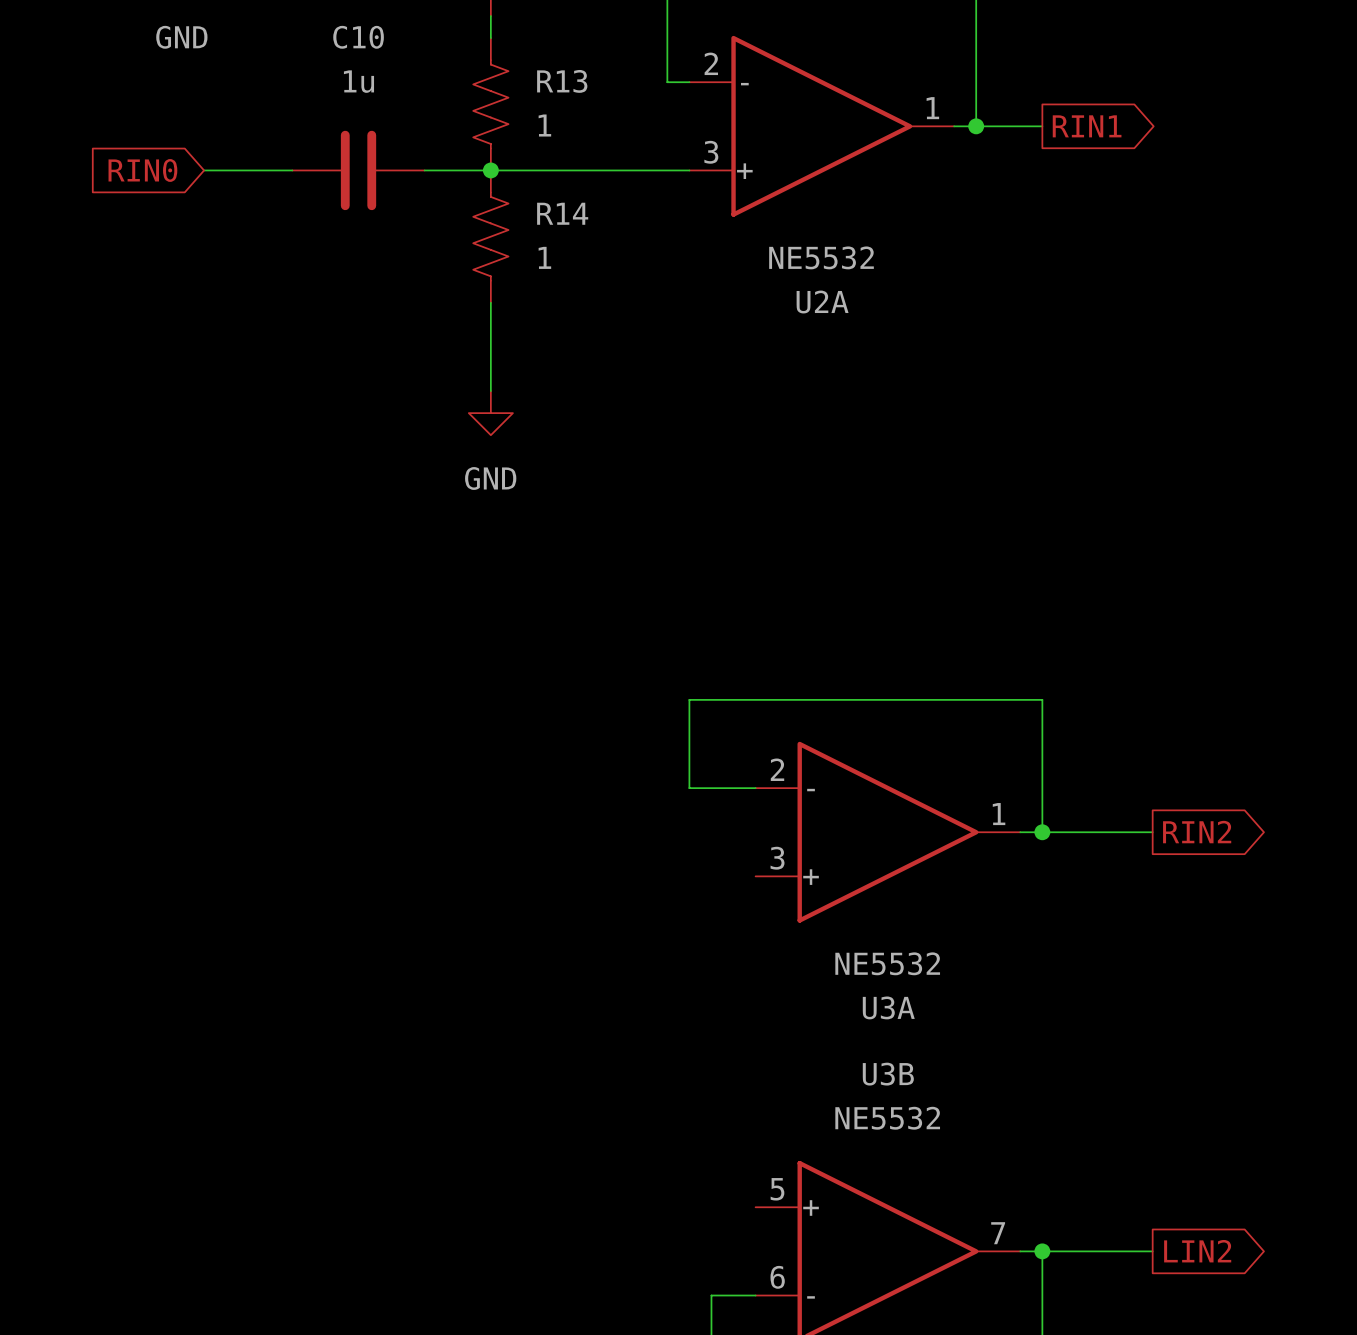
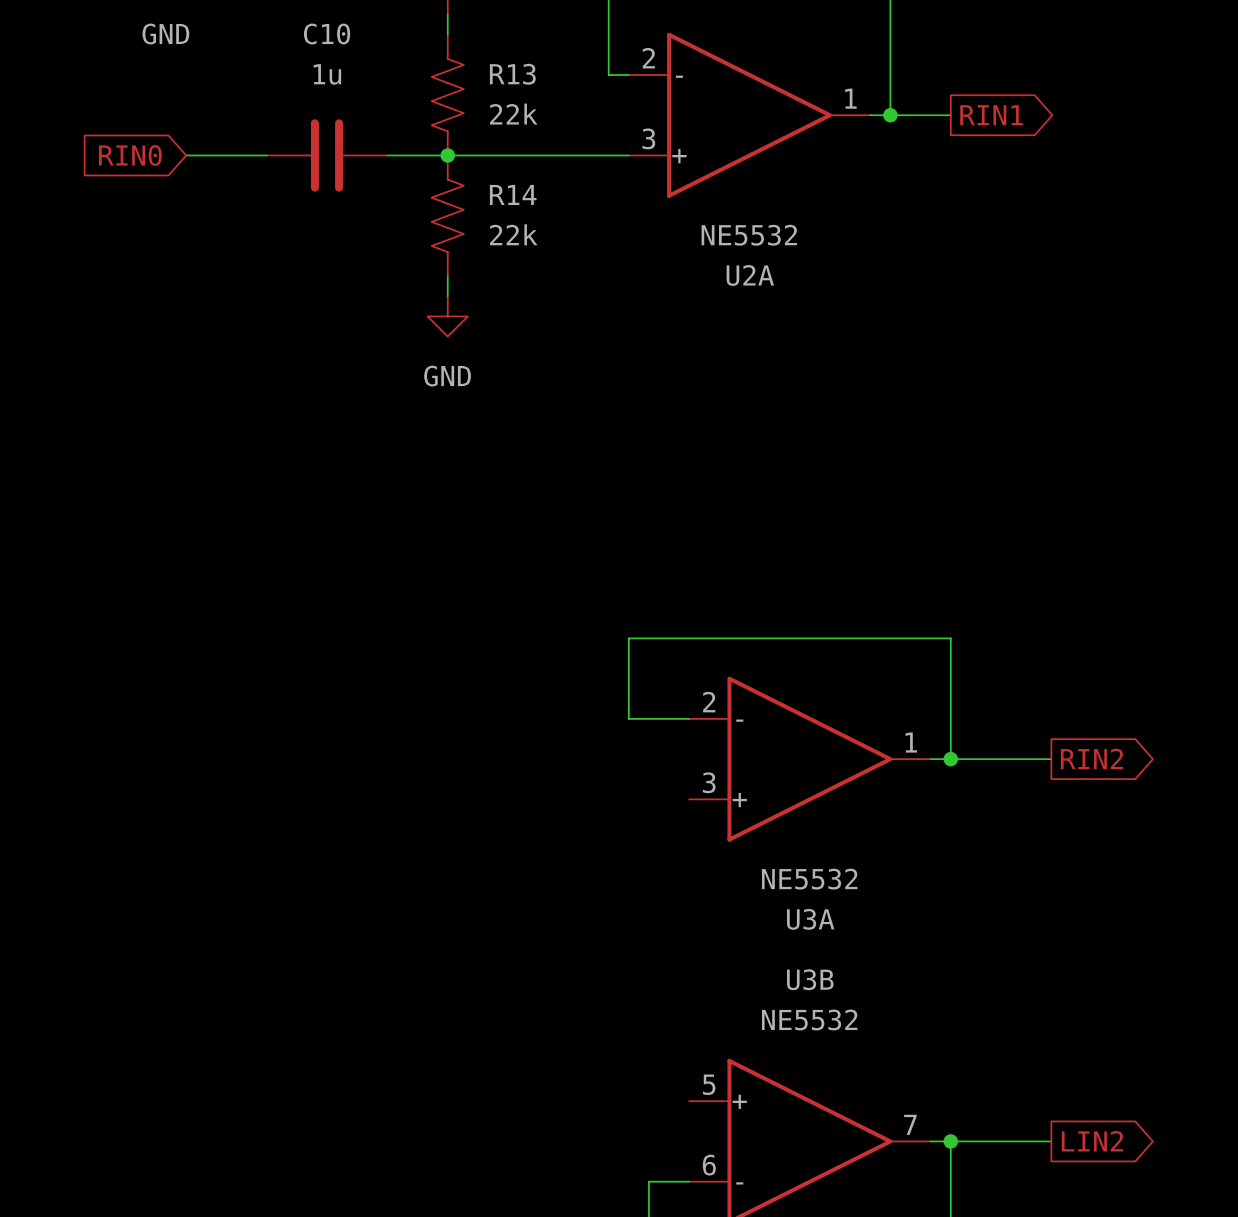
R13 value: 1 (544, 125) -> 22k (513, 114)
R14 value: 1 (544, 257) -> 22k (513, 234)
wire: (490, 324) (490, 391) -> none
power symbol position: GND (490, 413) -> GND (447, 316)

